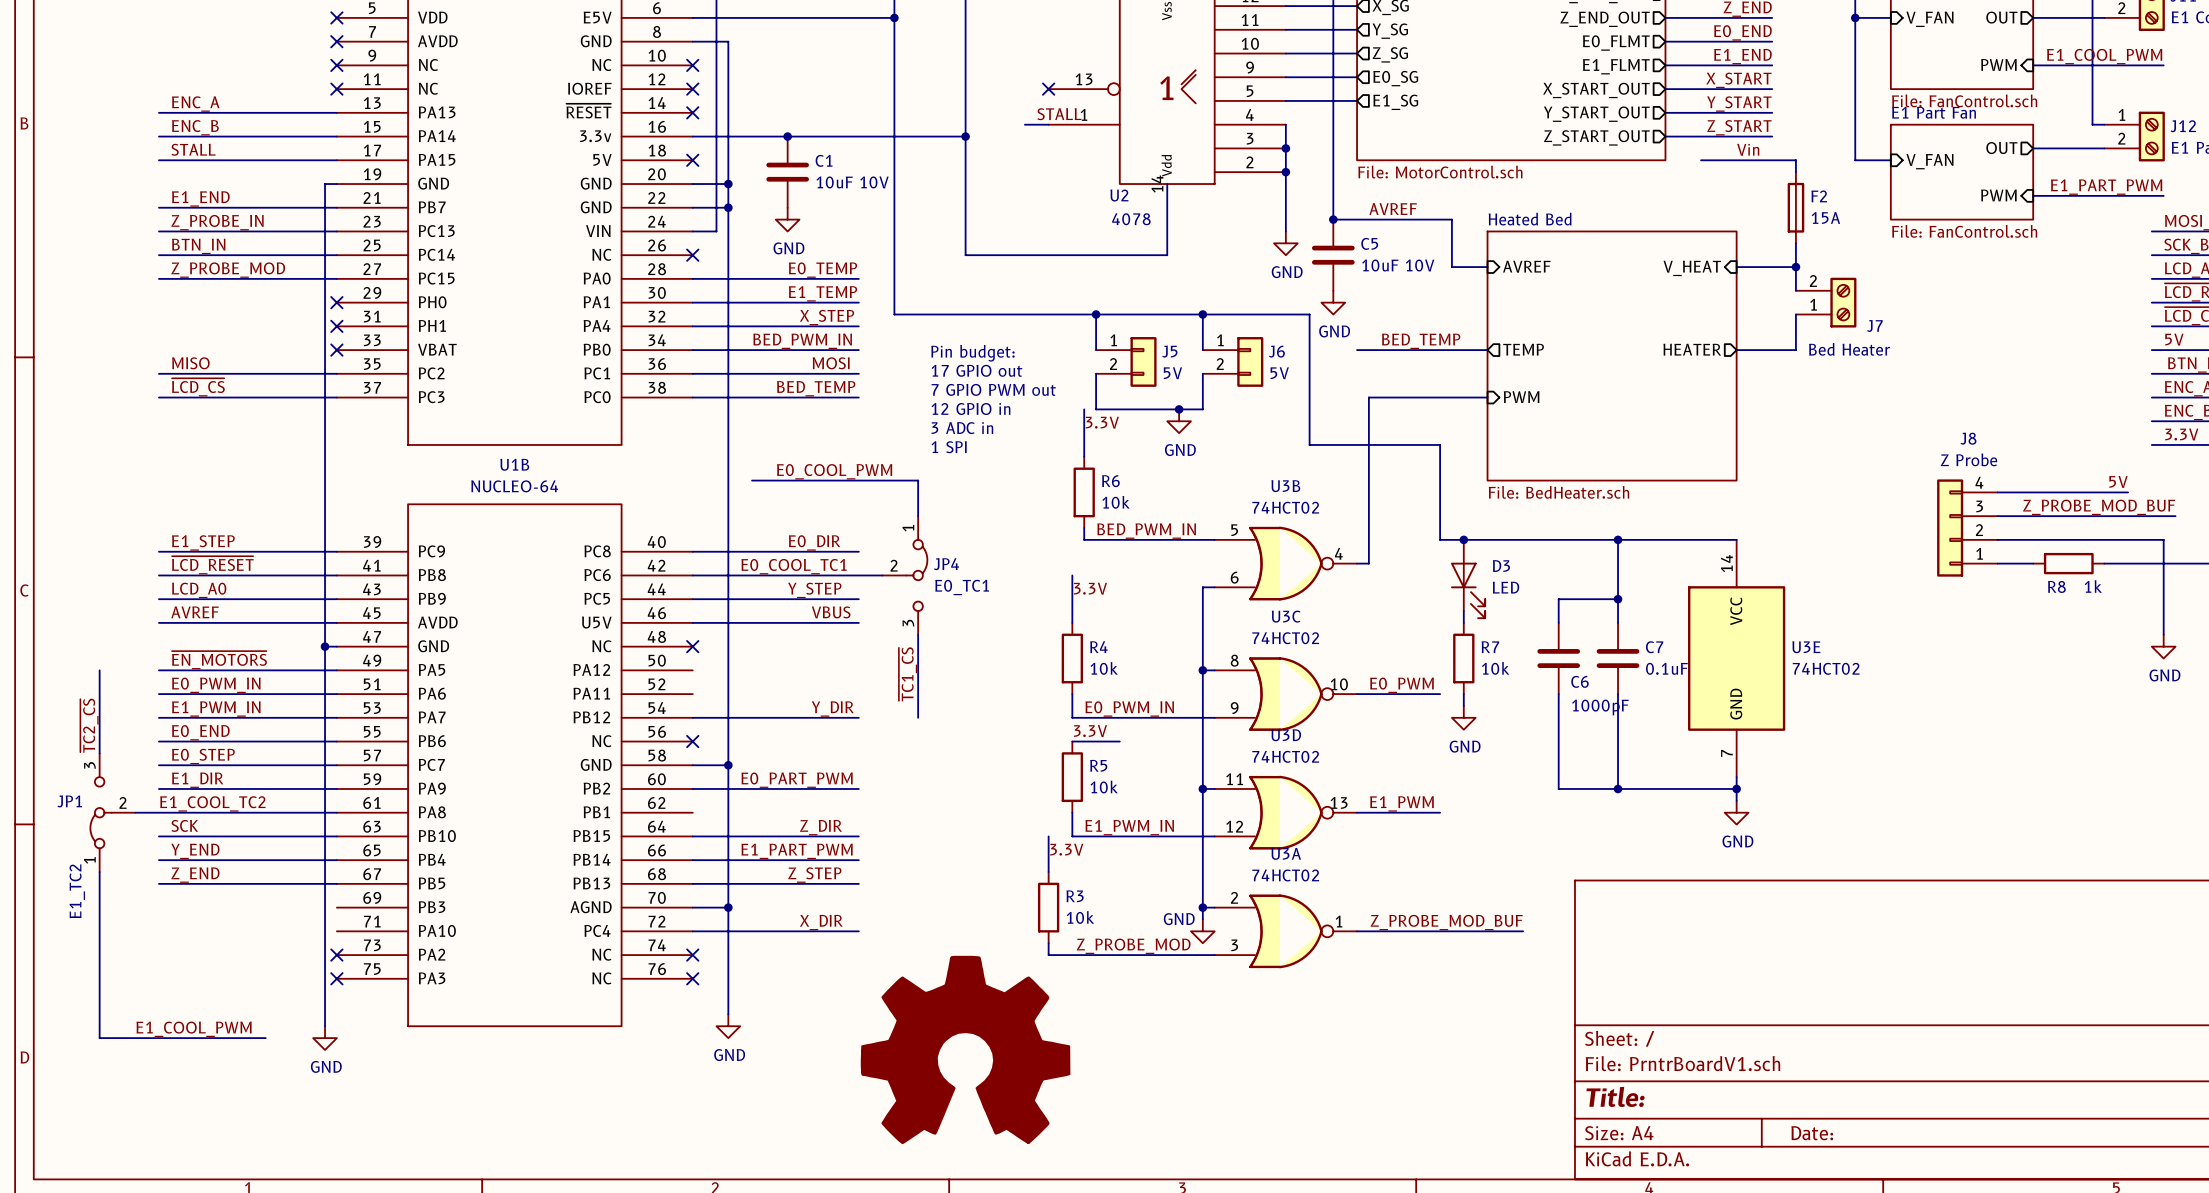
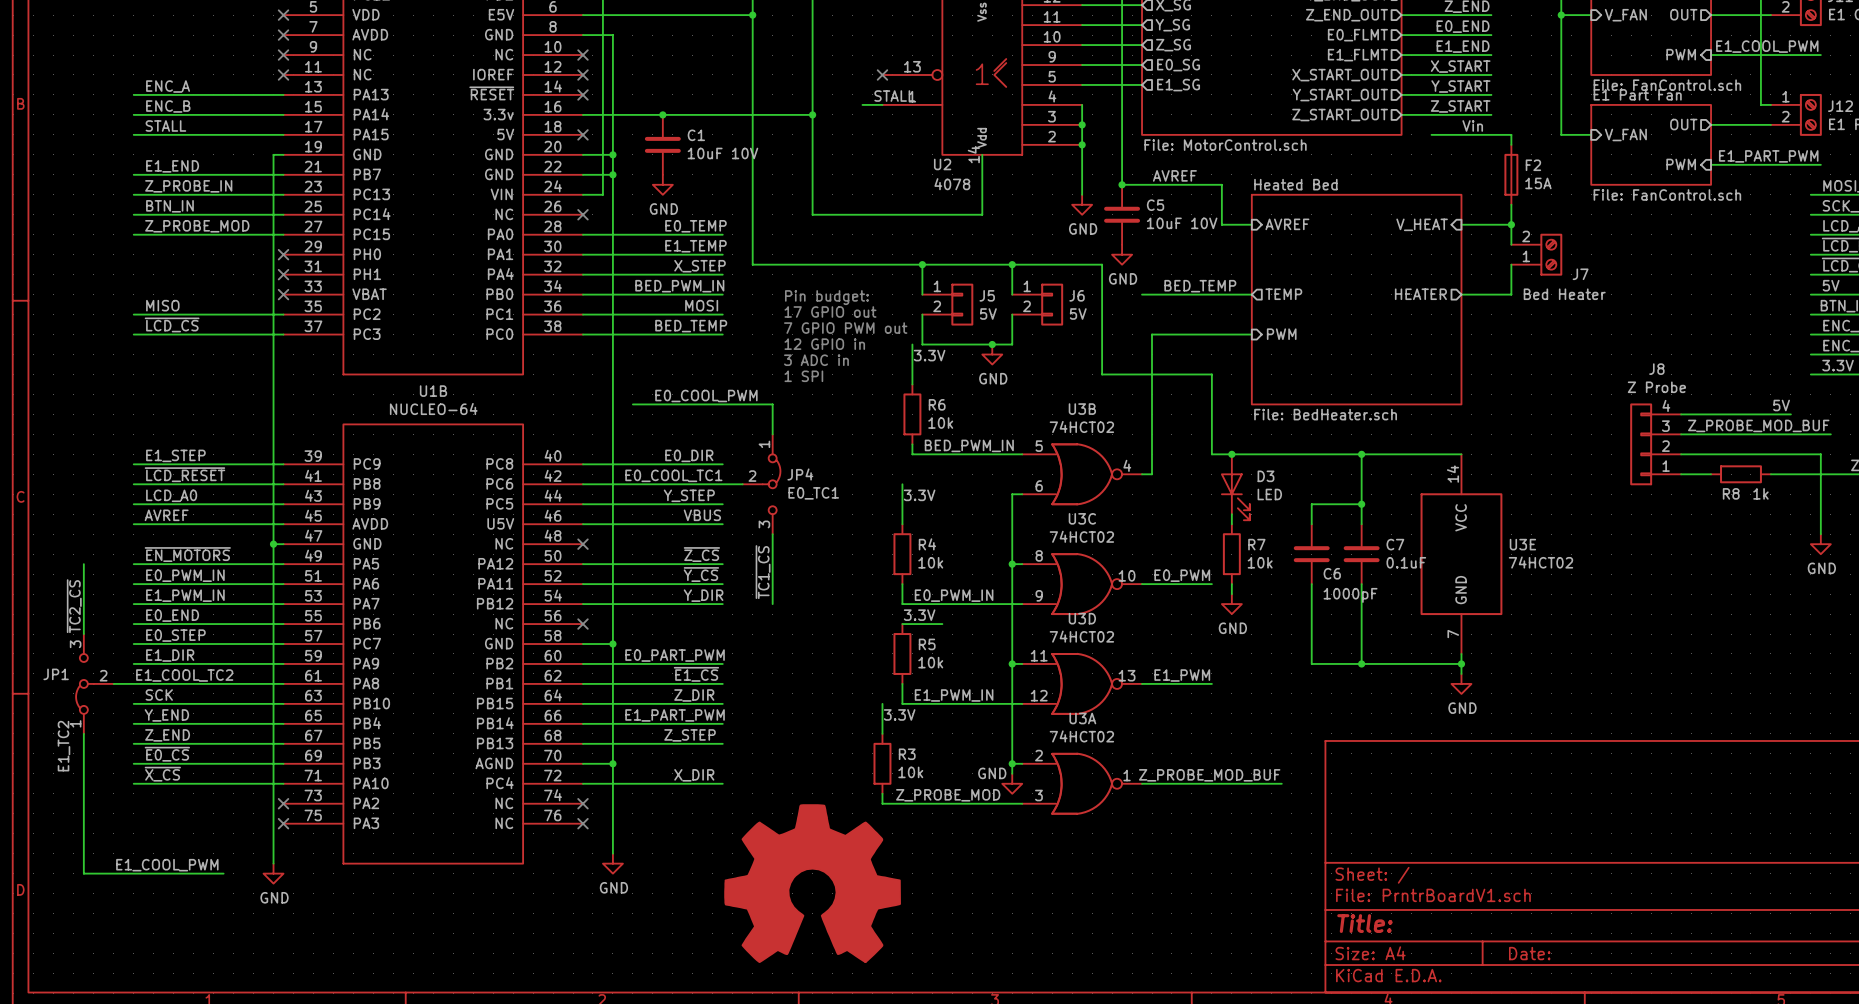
label: none -> ~{Z_CS} (701, 554)
wire: none -> (582, 564) (722, 564)
label: none -> ~{Y_CS} (701, 574)
wire: none -> (582, 584) (722, 584)
label: none -> ~{E1_CS} (696, 674)
wire: none -> (582, 683) (722, 683)
label: none -> ~{E0_CS} (167, 754)
wire: none -> (133, 763) (283, 763)
label: none -> ~{X_CS} (162, 774)
wire: none -> (133, 783) (283, 783)

